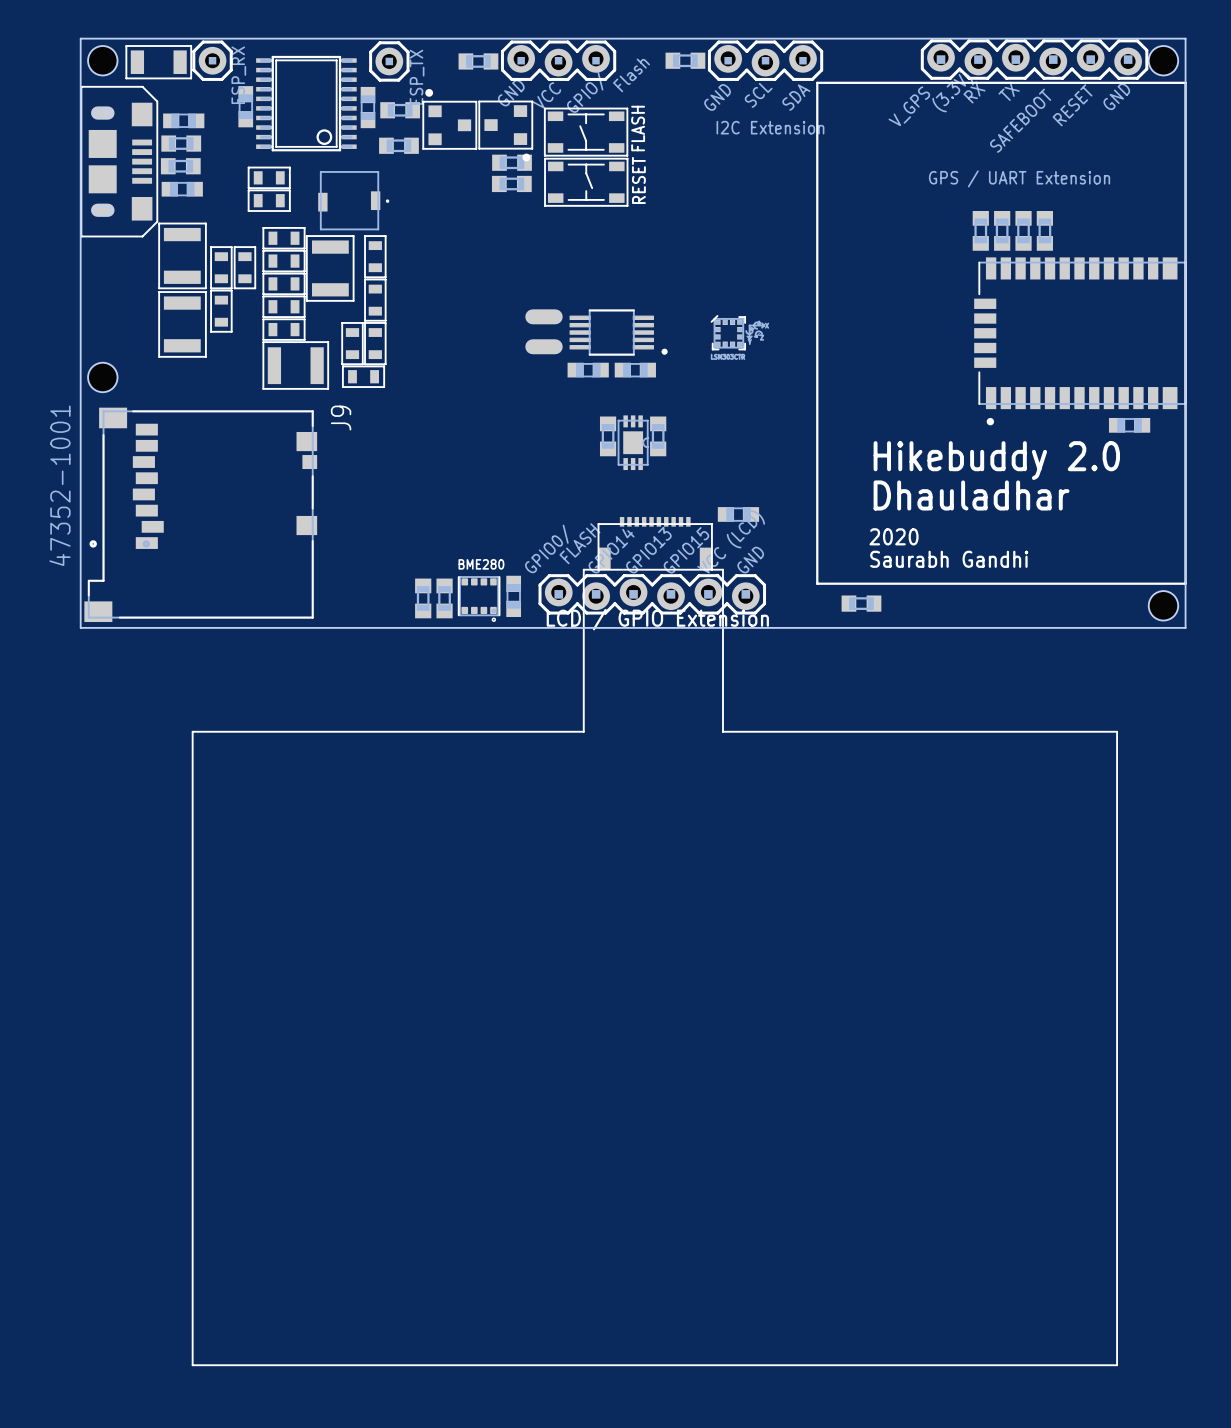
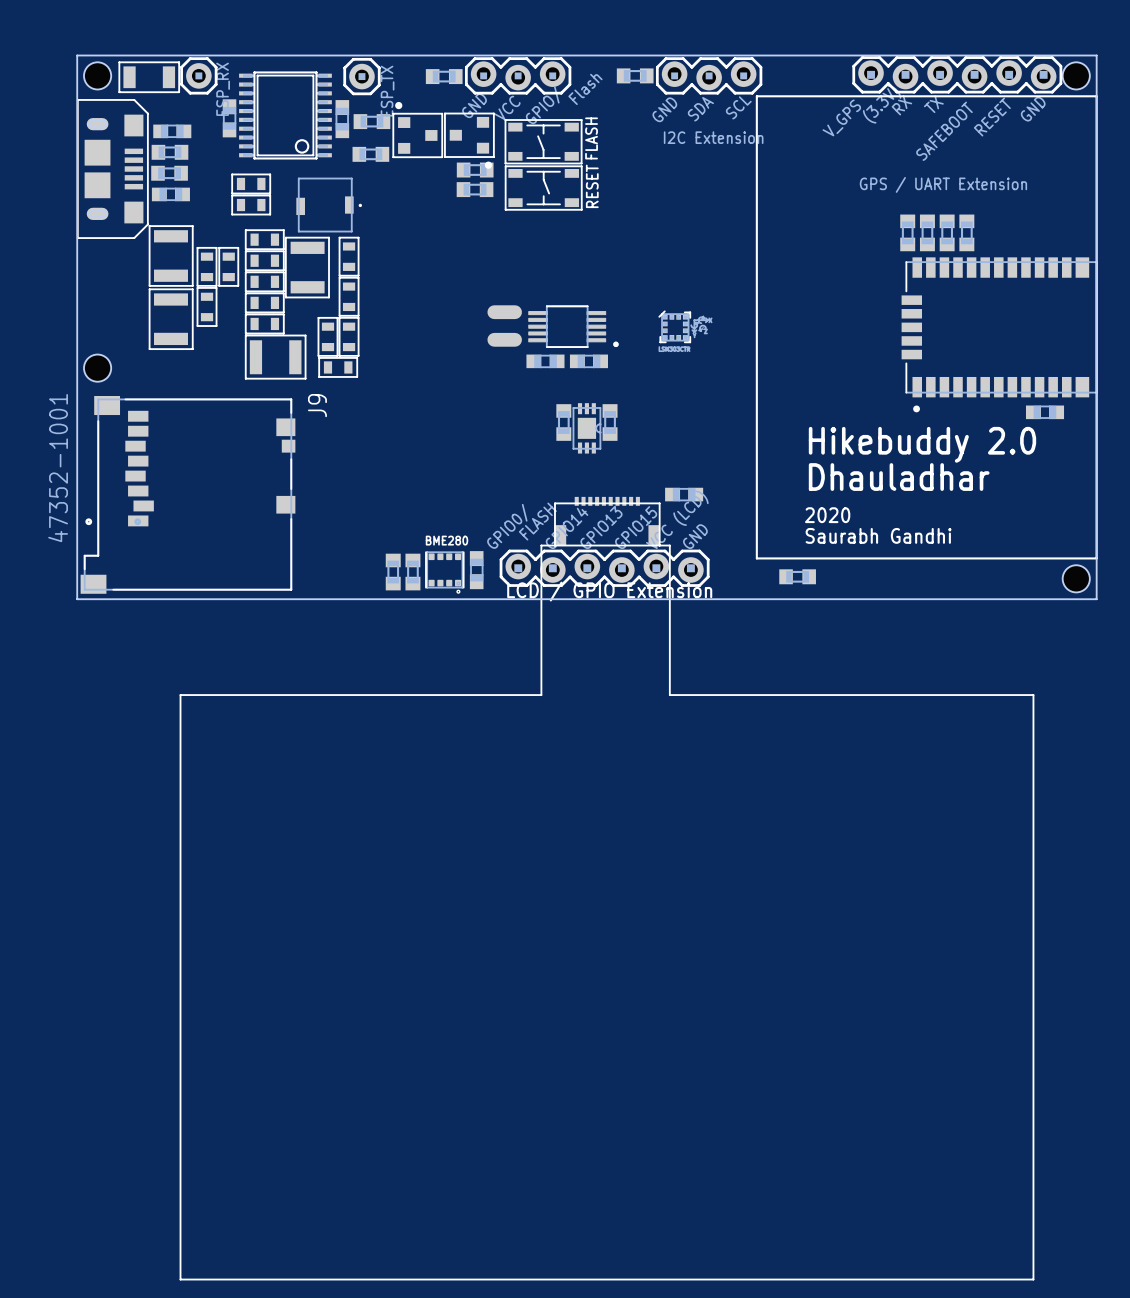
text position: SCL (758, 95) -> SCL (738, 107)
text position: SDA (796, 97) -> SDA (700, 109)

